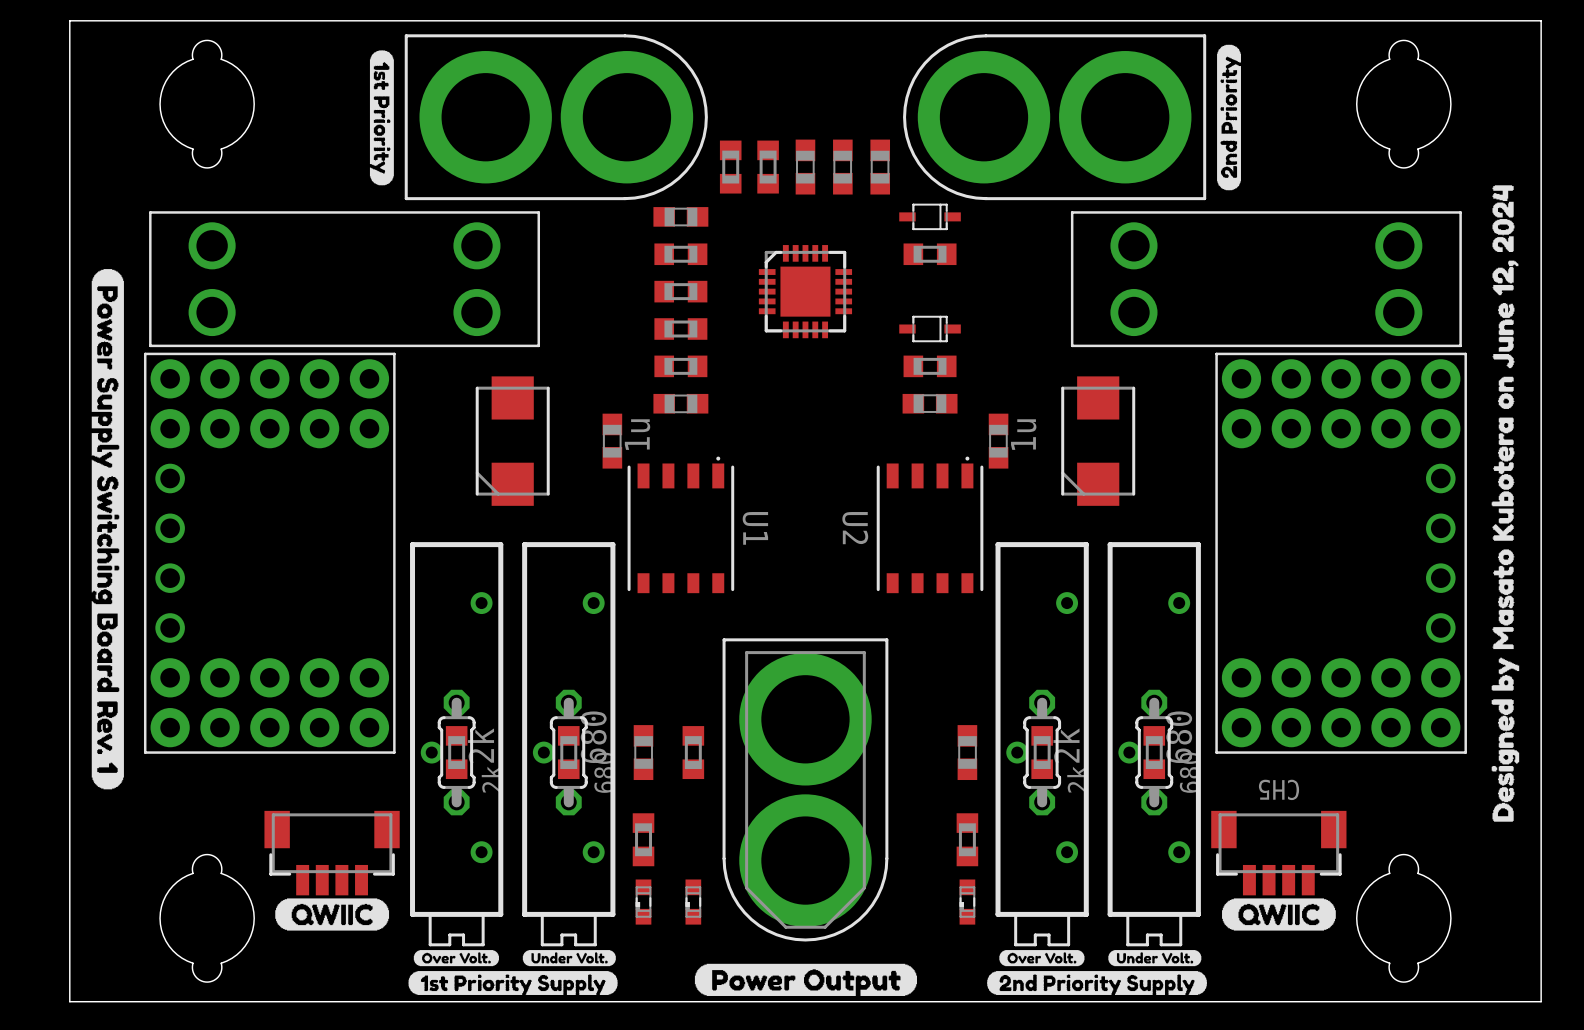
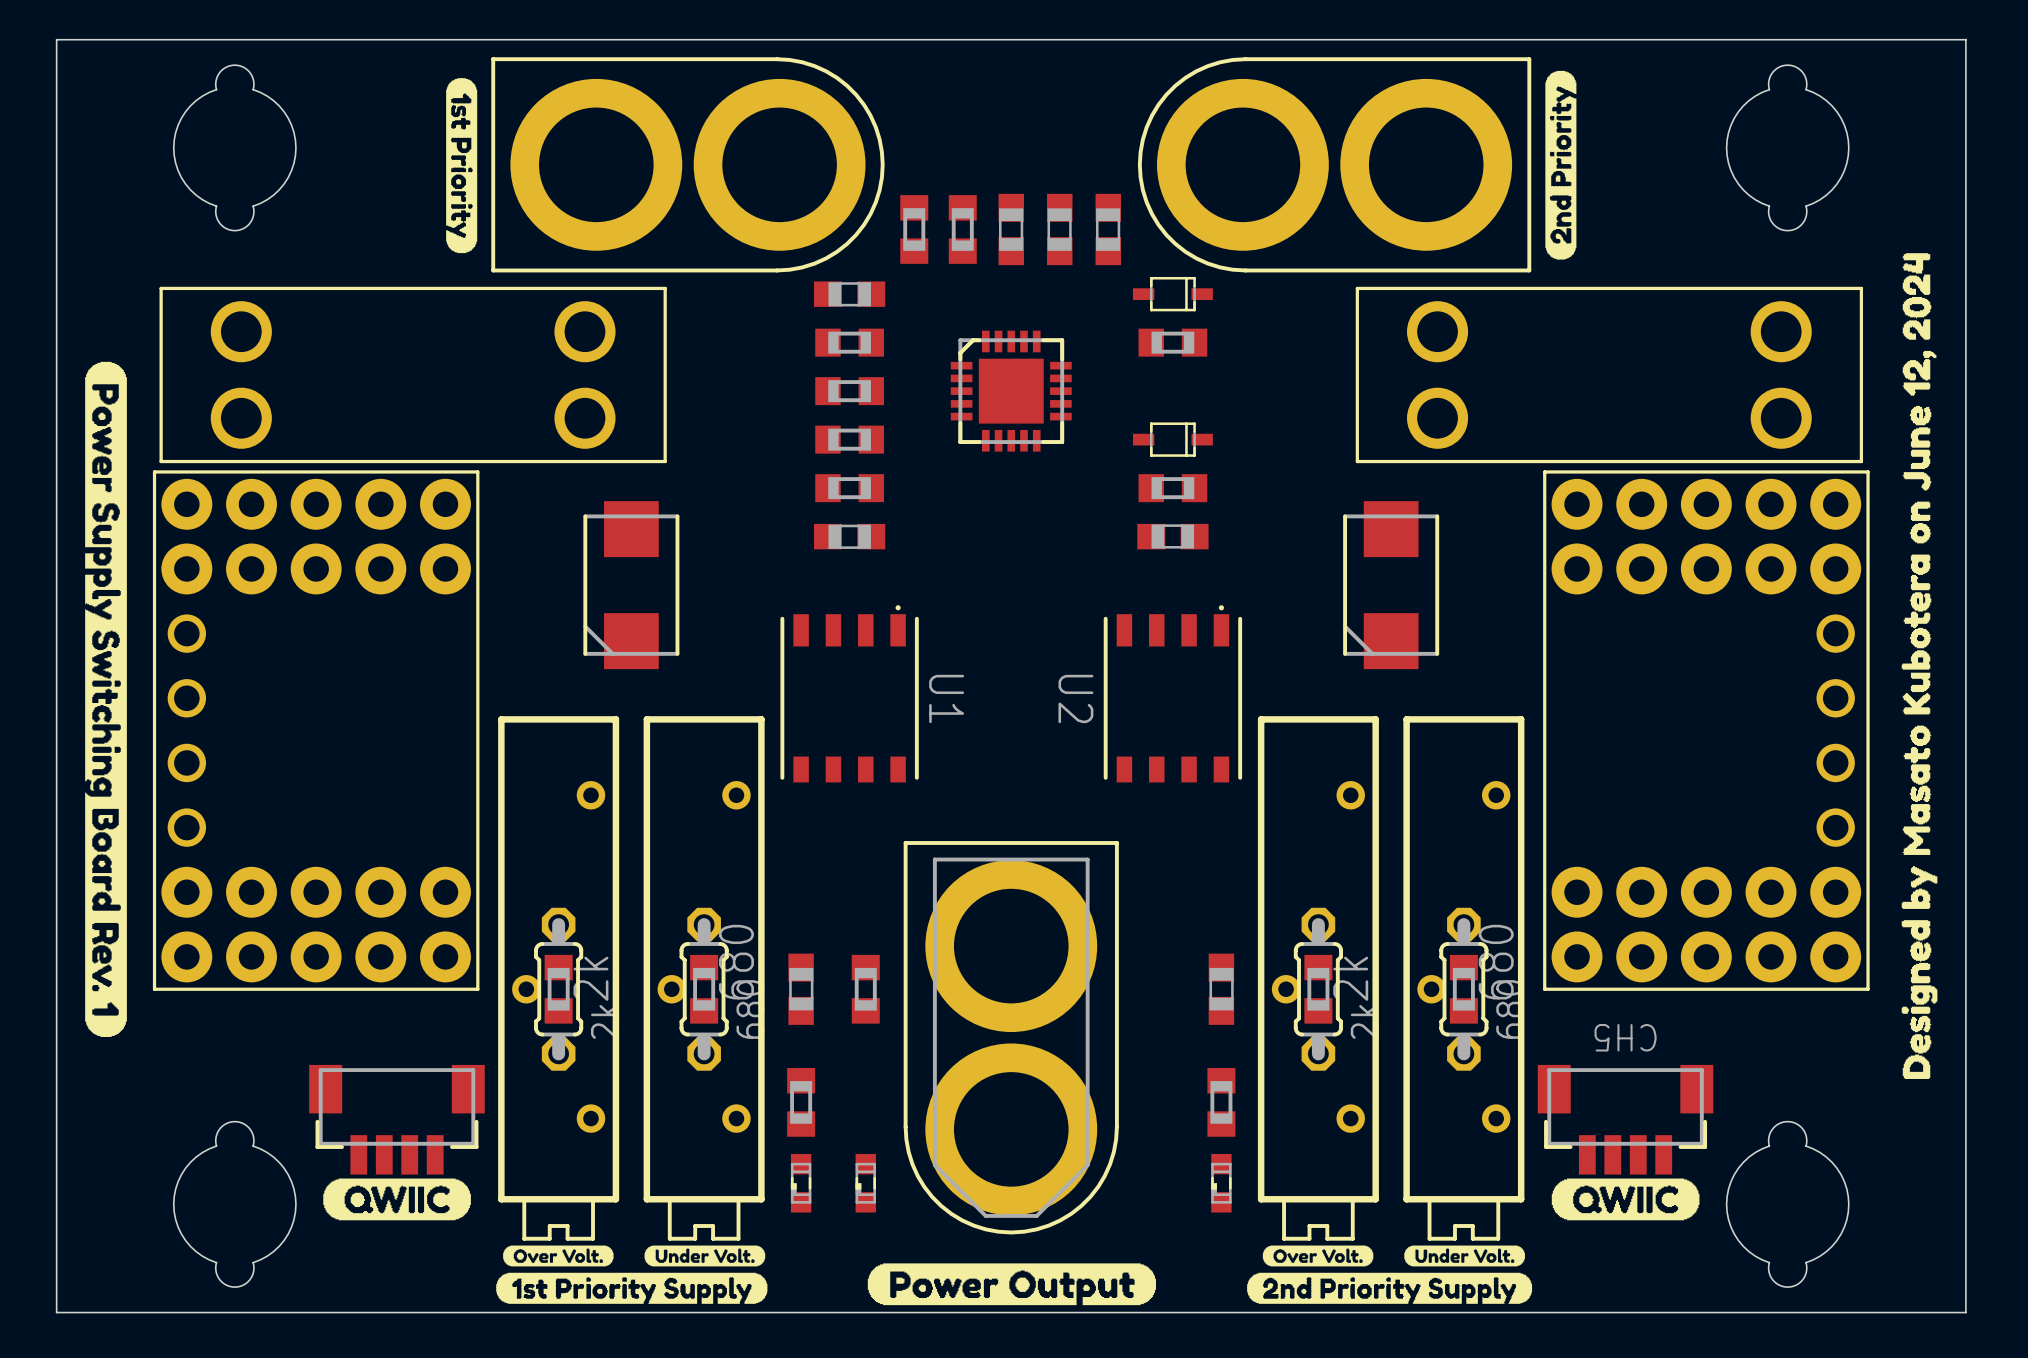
part: 1u (612, 441) -> none
part: 1u (998, 441) -> none

